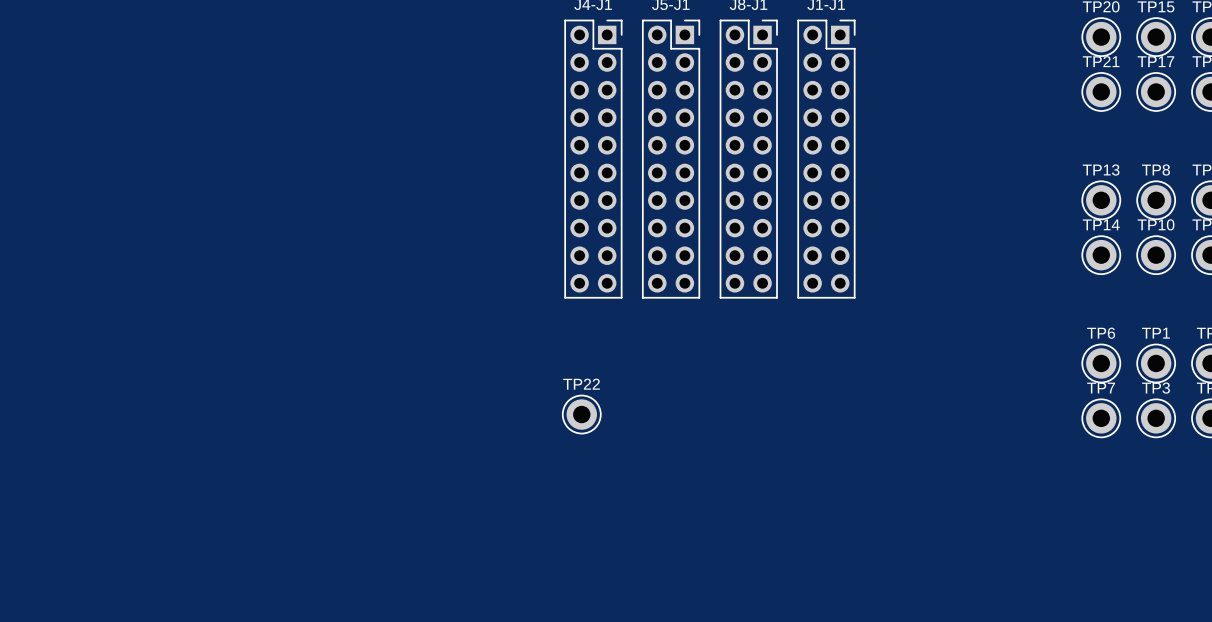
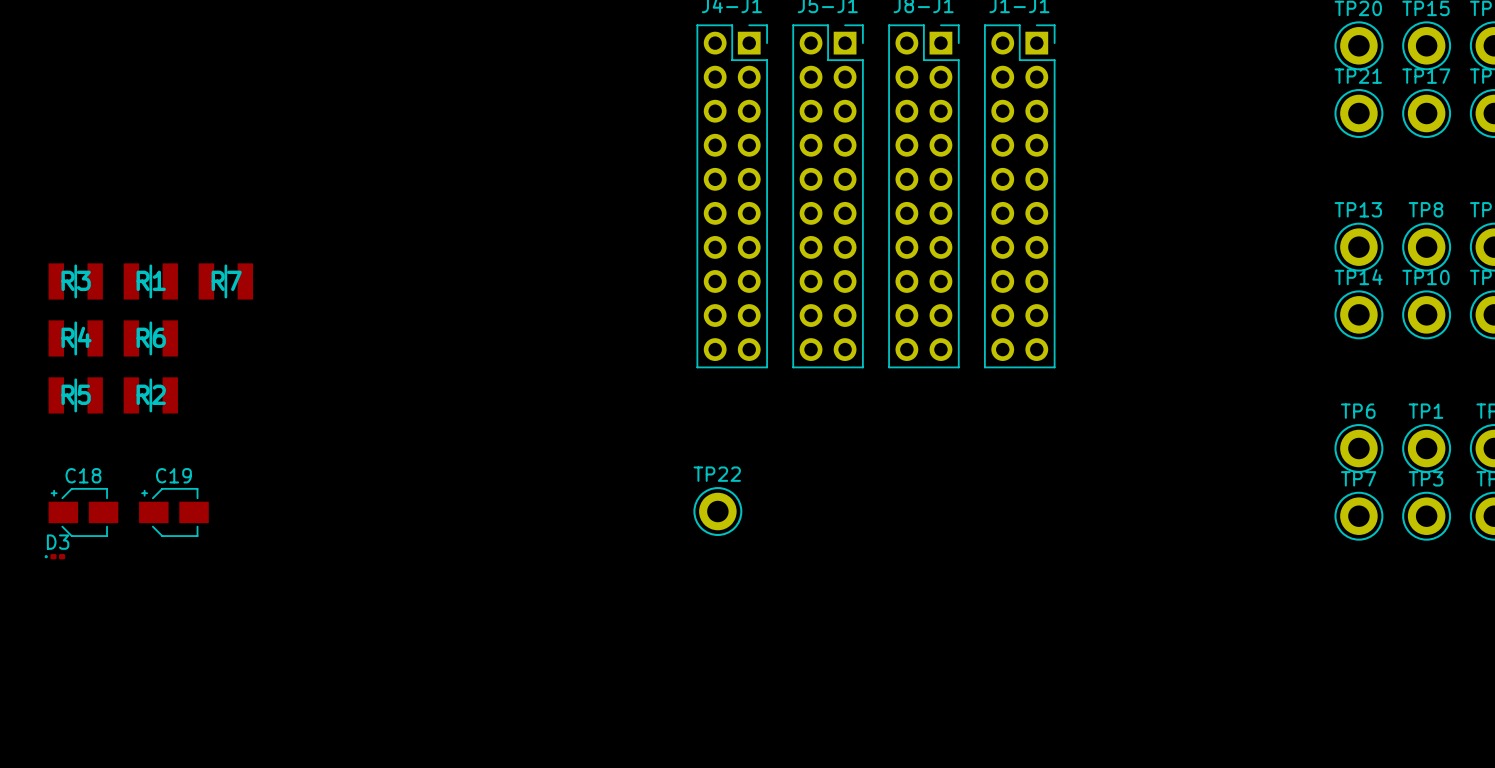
R3: none -> (75, 281)
R1: none -> (150, 281)
R7: none -> (225, 281)
R4: none -> (75, 338)
R6: none -> (150, 338)
R5: none -> (75, 395)
R2: none -> (150, 395)
C18: none -> (83, 512)
C19: none -> (173, 512)
D3: none -> (55, 556)

